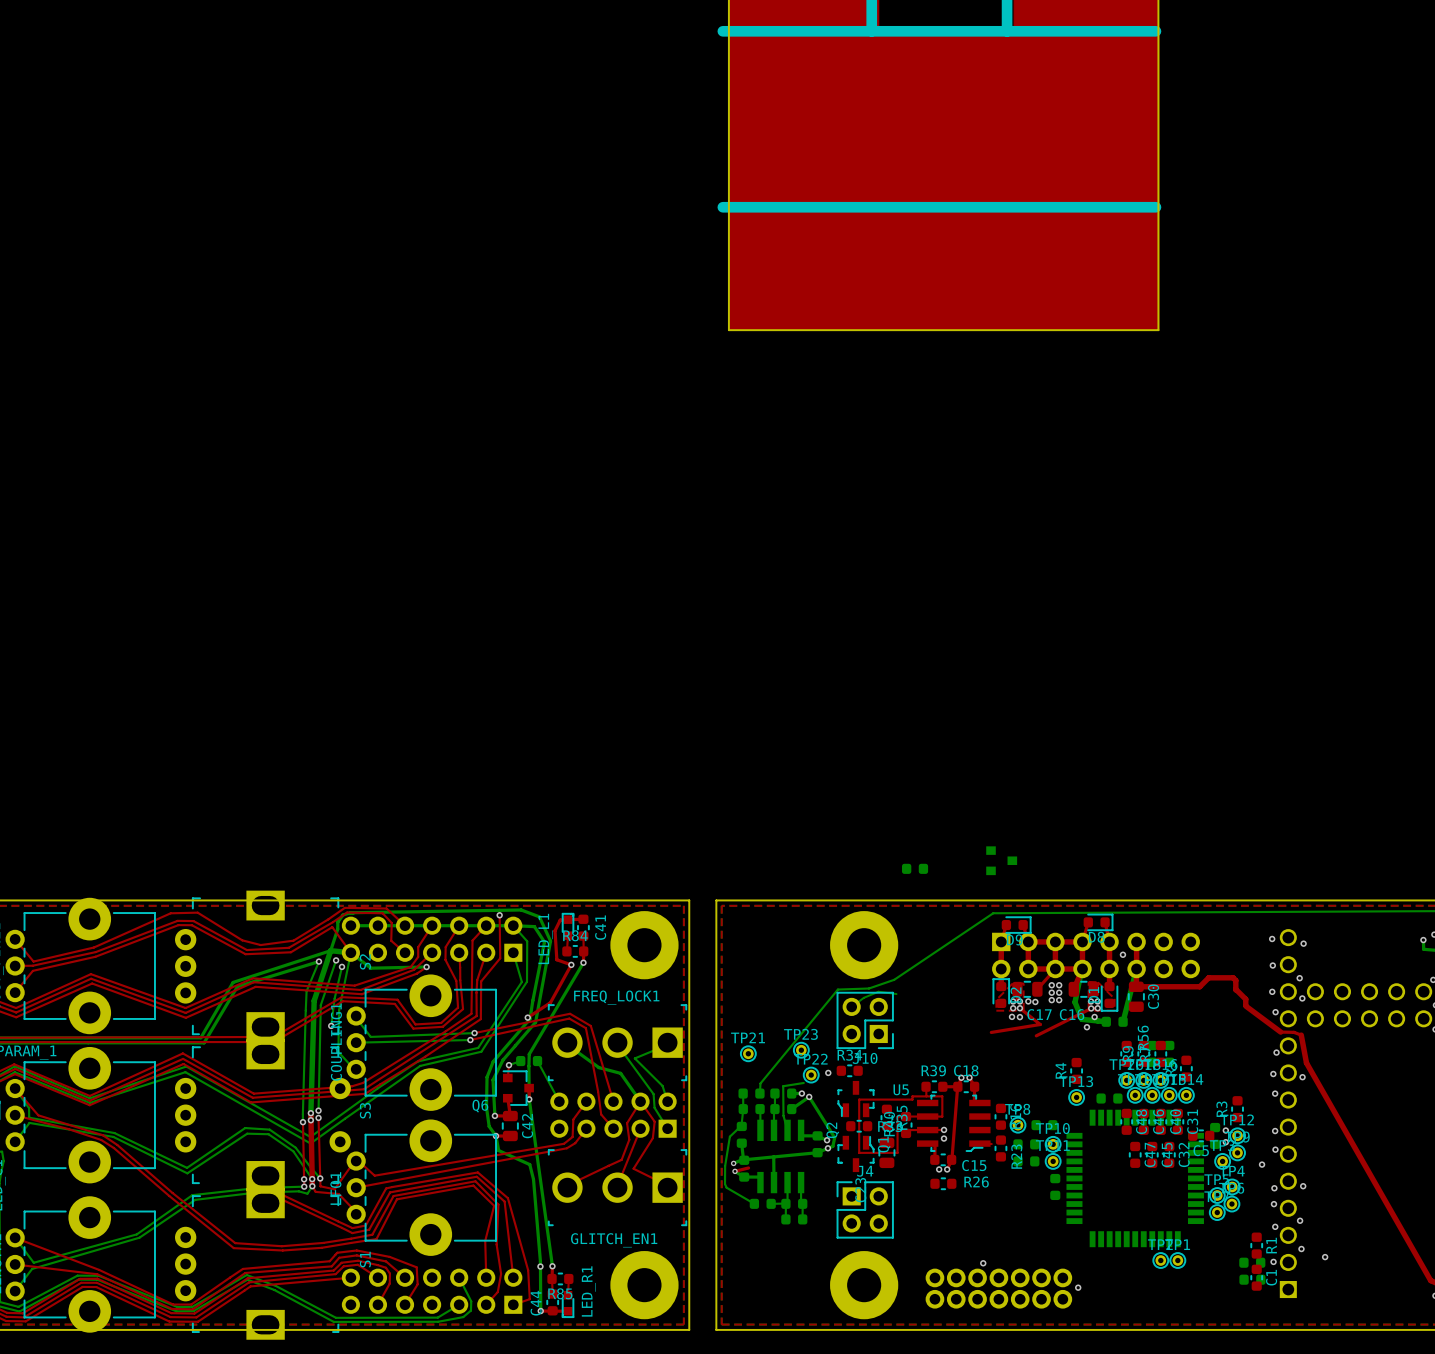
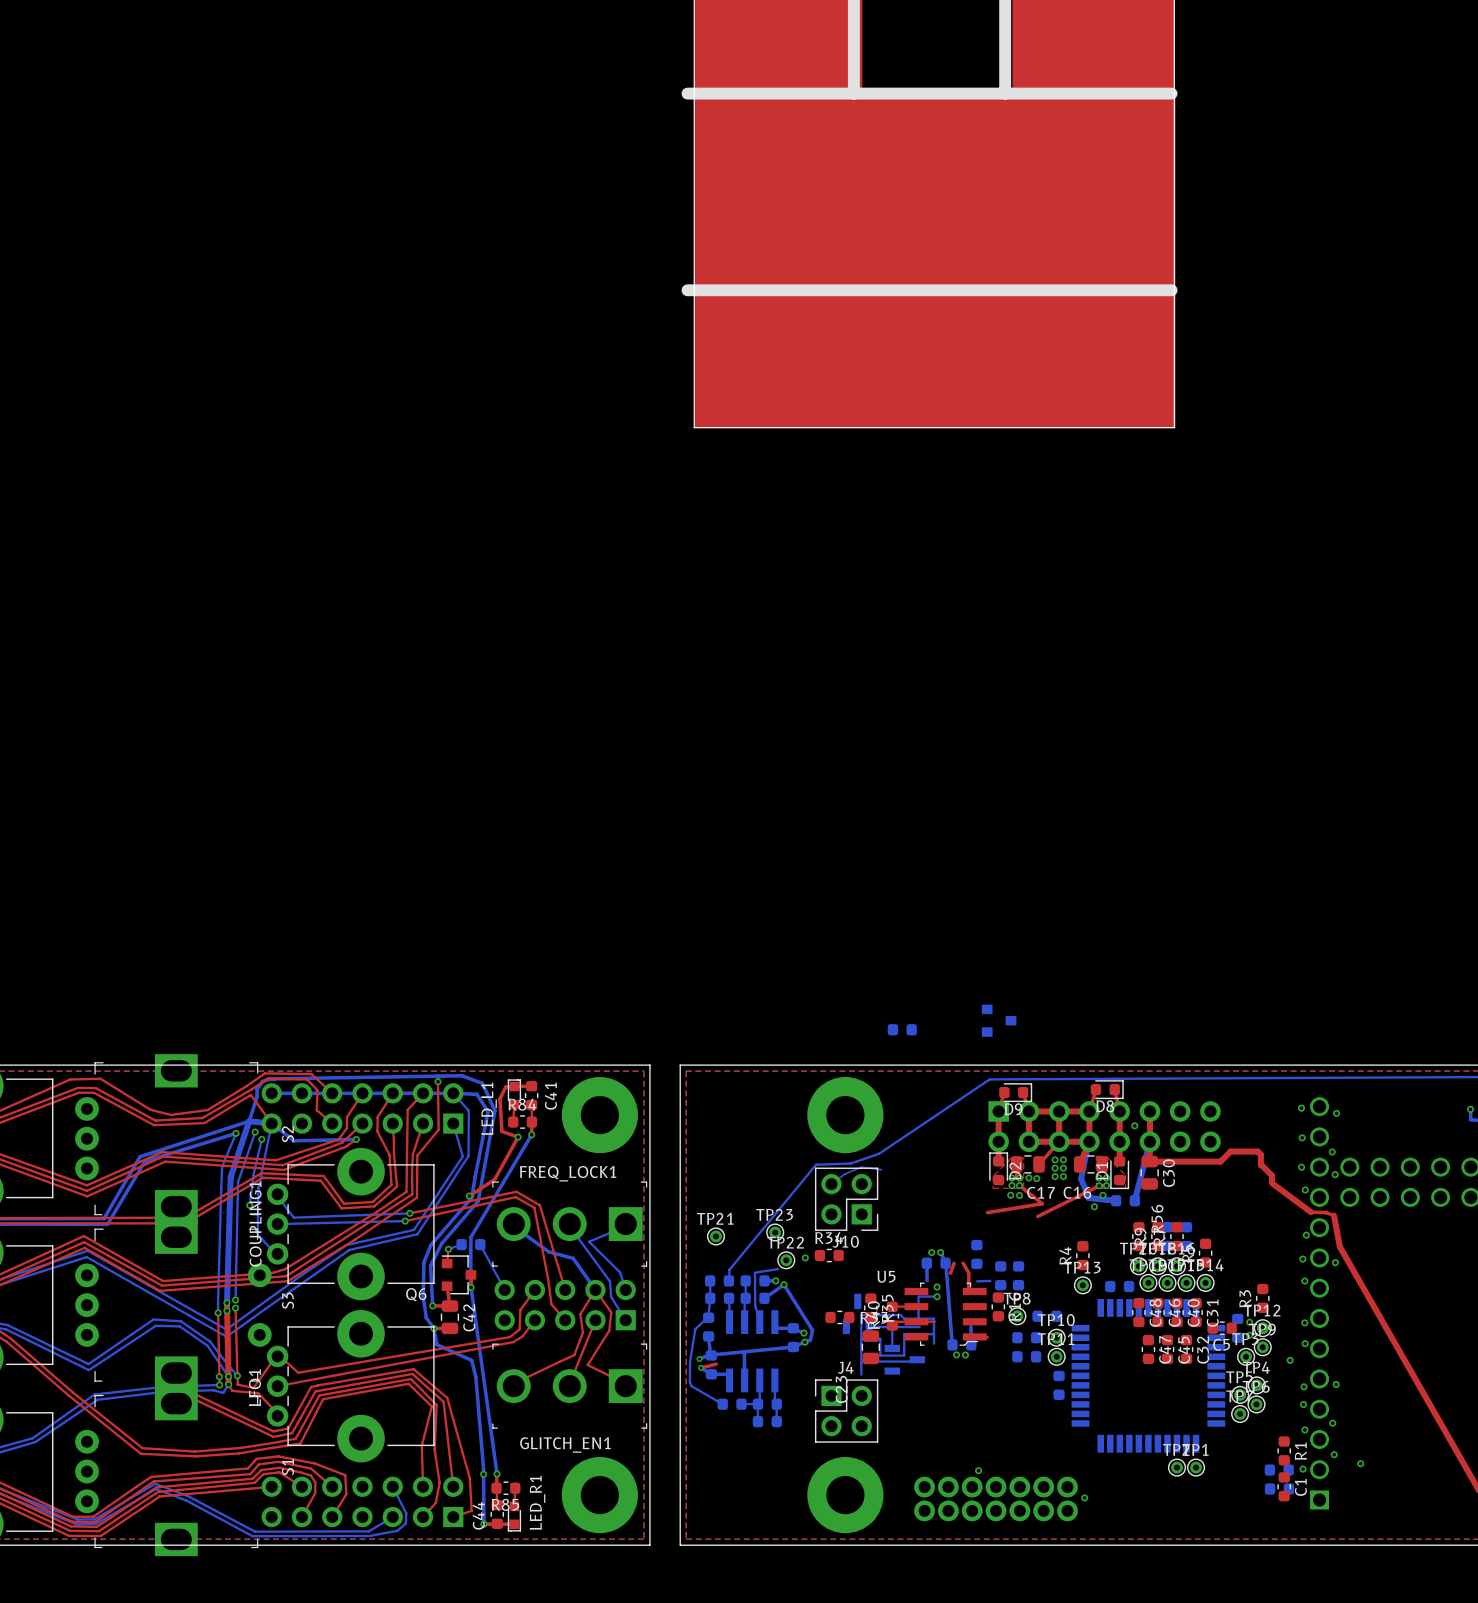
via: none -> (931, 1252)
bottom track: none -> (940, 1252) (945, 1263) (952, 1344)
via: none -> (940, 1252)
bottom track: none -> (926, 1263) (927, 1280)
via: (961, 1077) -> none
via: (969, 1077) -> none
R39: (934, 1086) -> none
top track: (942, 1086) (957, 1086) (951, 1159) (947, 1169) -> none
C18 side: top (966, 1086) -> bottom (961, 1344)
top track: (926, 1087) (926, 1096) -> none
part: none -> (1000, 1275)
bottom track: none -> (990, 1280) (977, 1281)
via: none -> (937, 1287)
Q2 side: top (856, 1099) -> bottom (904, 1359)
bottom track: none -> (918, 1296) (937, 1296)
via: none -> (937, 1296)
bottom track: none -> (918, 1297) (918, 1311)
top track: (926, 1116) (942, 1116) (942, 1096) (912, 1096) (912, 1099) (859, 1099) (859, 1152) (897, 1152) (897, 1116) (906, 1116) -> none
bottom track: none -> (918, 1312) (918, 1318)
bottom track: none -> (900, 1315) (861, 1315) (861, 1374)
bottom track: none -> (901, 1315) (904, 1318) (933, 1318) (933, 1343)
via: (944, 1129) -> none
bottom track: none -> (892, 1324) (892, 1348)
bottom track: none -> (867, 1327) (919, 1327)
bottom track: none -> (970, 1326) (971, 1344)
via: (944, 1138) -> none
bottom track: none -> (933, 1334) (904, 1334) (904, 1355) (880, 1355) (880, 1338) (861, 1338)
top track: (935, 1144) (934, 1159) -> none
R23 side: top (1000, 1148) -> bottom (1018, 1275)
Q1 side: top (856, 1153) -> bottom (857, 1313)
C15 side: top (943, 1159) -> bottom (936, 1263)
via: none -> (956, 1354)
via: none -> (965, 1355)
bottom track: none -> (874, 1361) (911, 1361)
via: (939, 1169) -> none
via: (947, 1169) -> none
R26 side: top (943, 1183) -> bottom (976, 1254)

